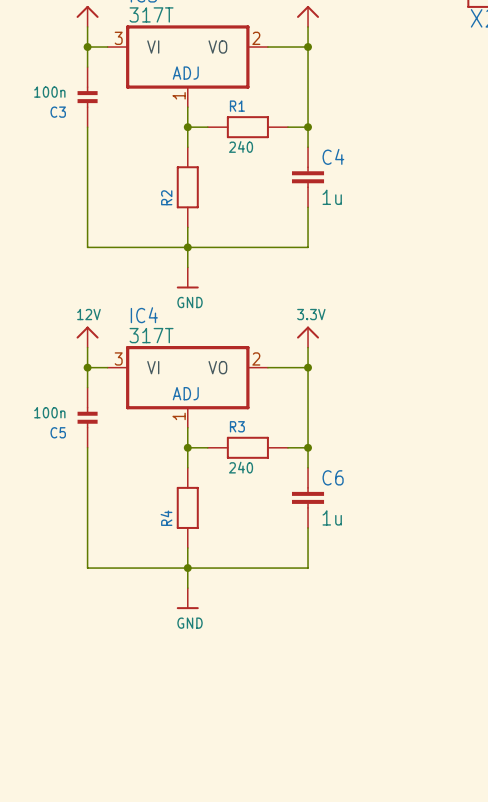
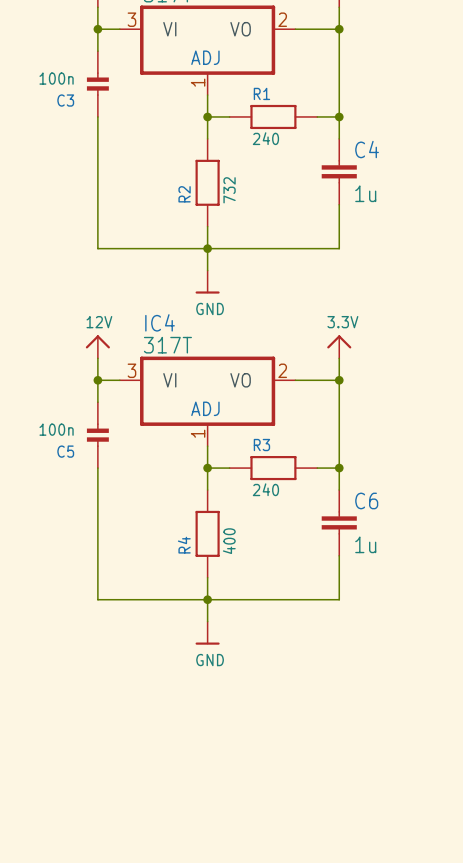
R2 value: none -> 732 (229, 190)
R4 value: none -> 400 (229, 541)

